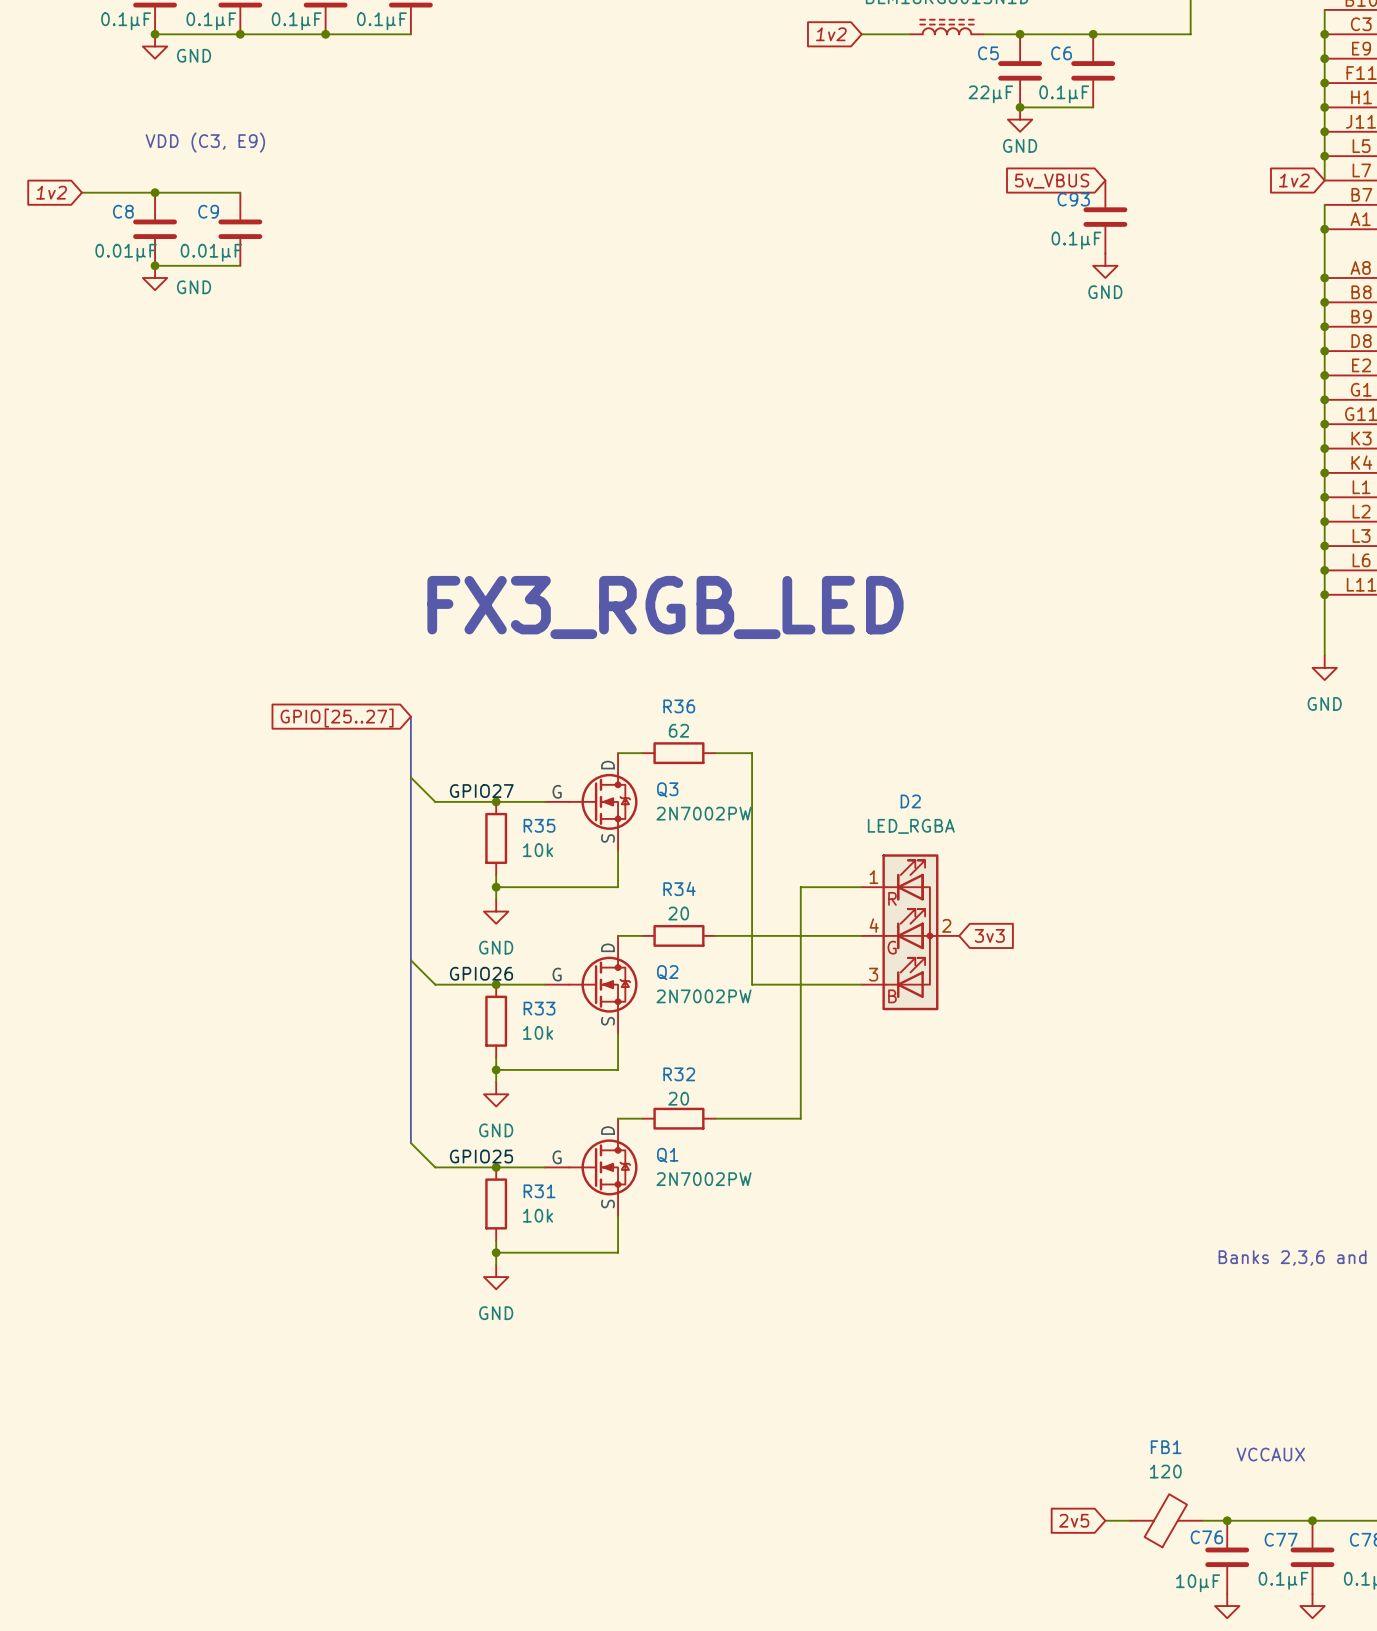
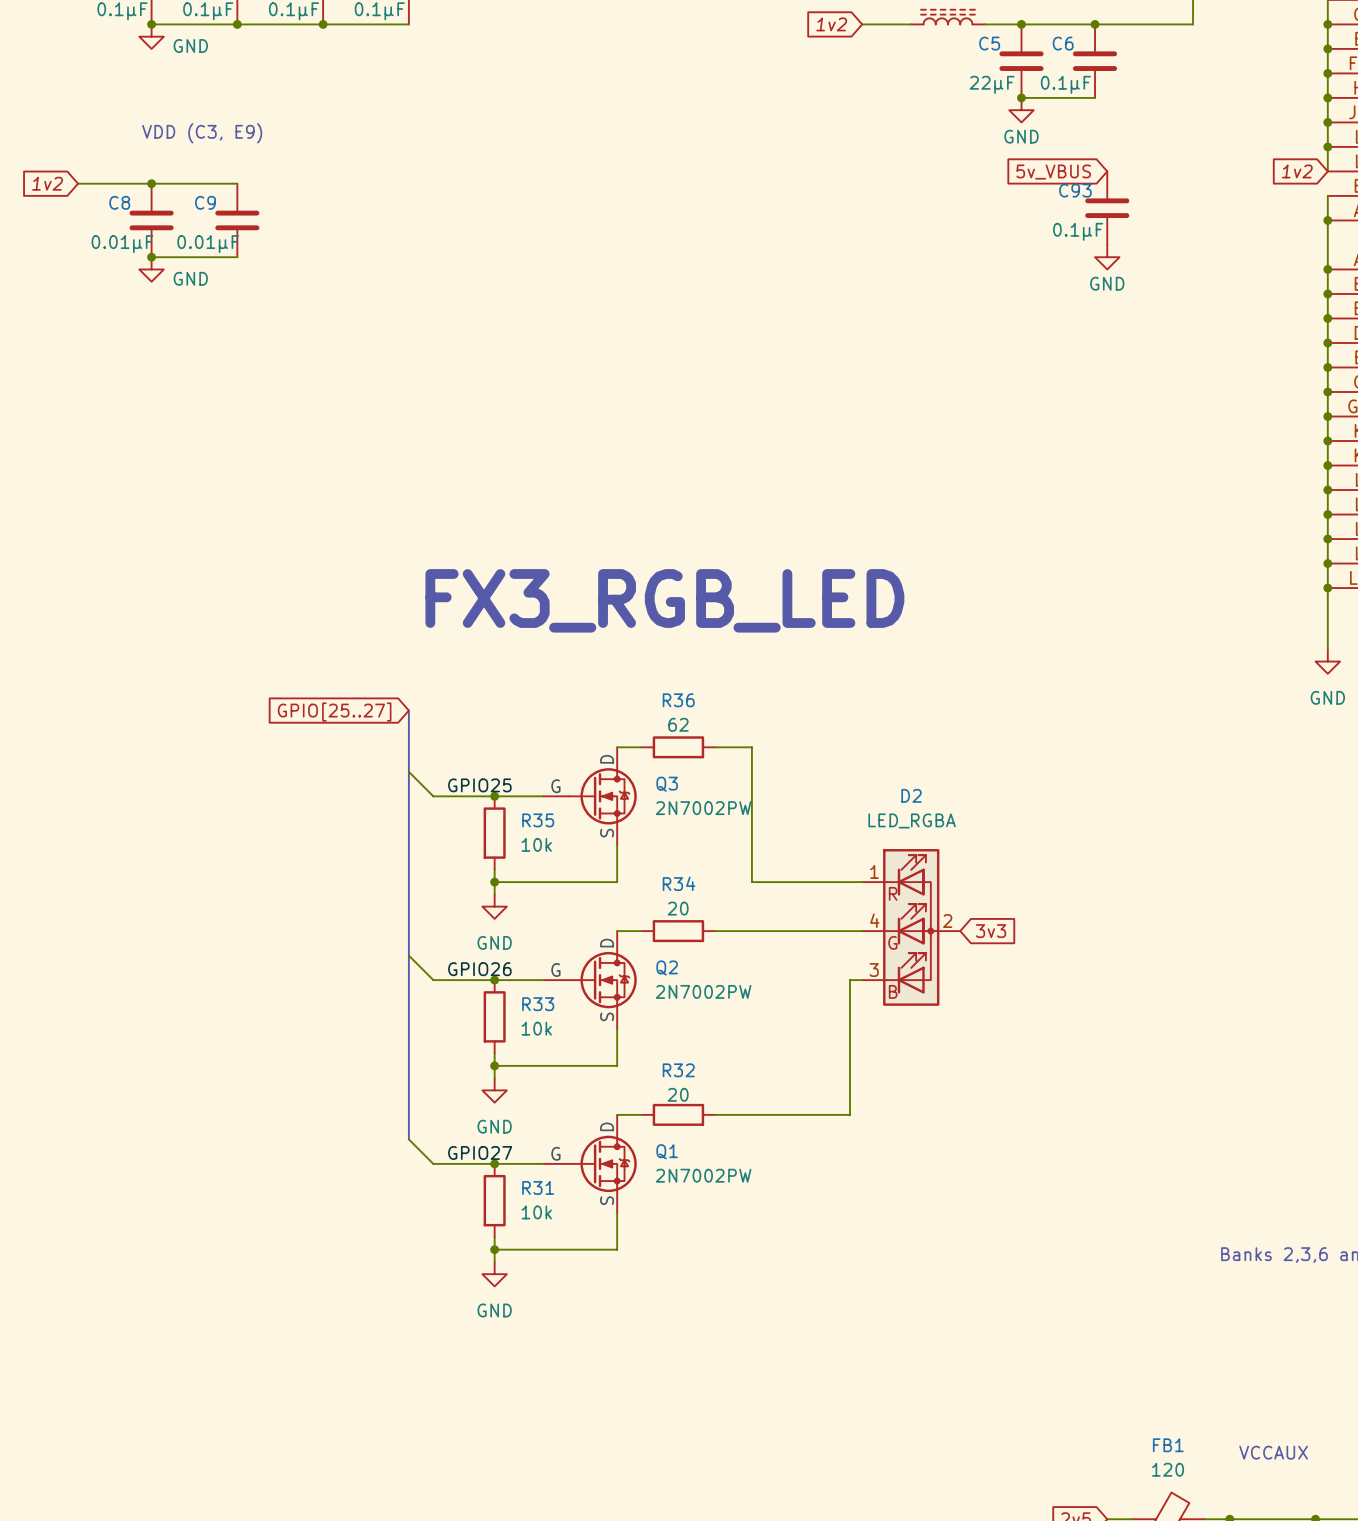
label: GPIO27 (481, 791) -> GPIO25 (479, 785)
wire: (752, 887) (752, 984) (849, 984) -> (751, 882) (800, 882)
wire: (800, 887) (800, 1118) -> (849, 980) (849, 1114) (800, 1114)
label: GPIO25 (481, 1156) -> GPIO27 (480, 1152)

